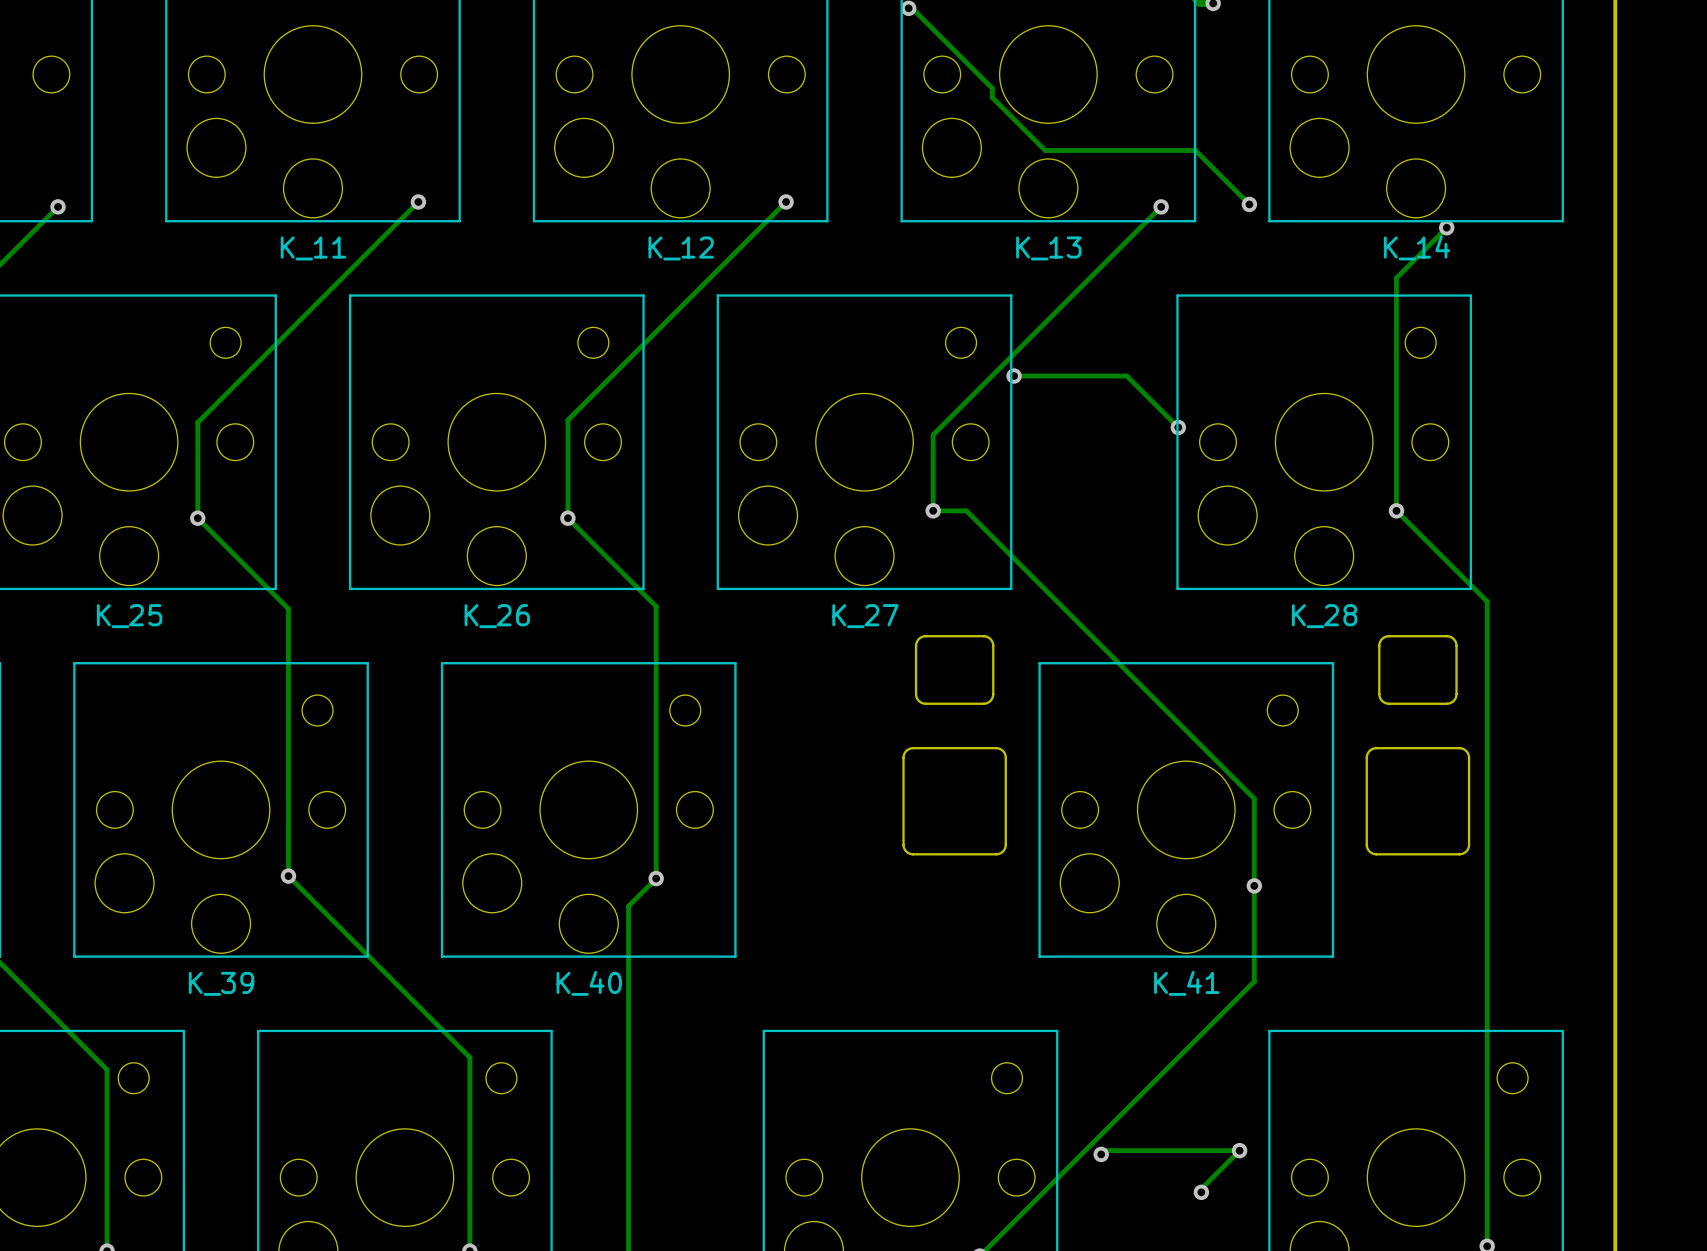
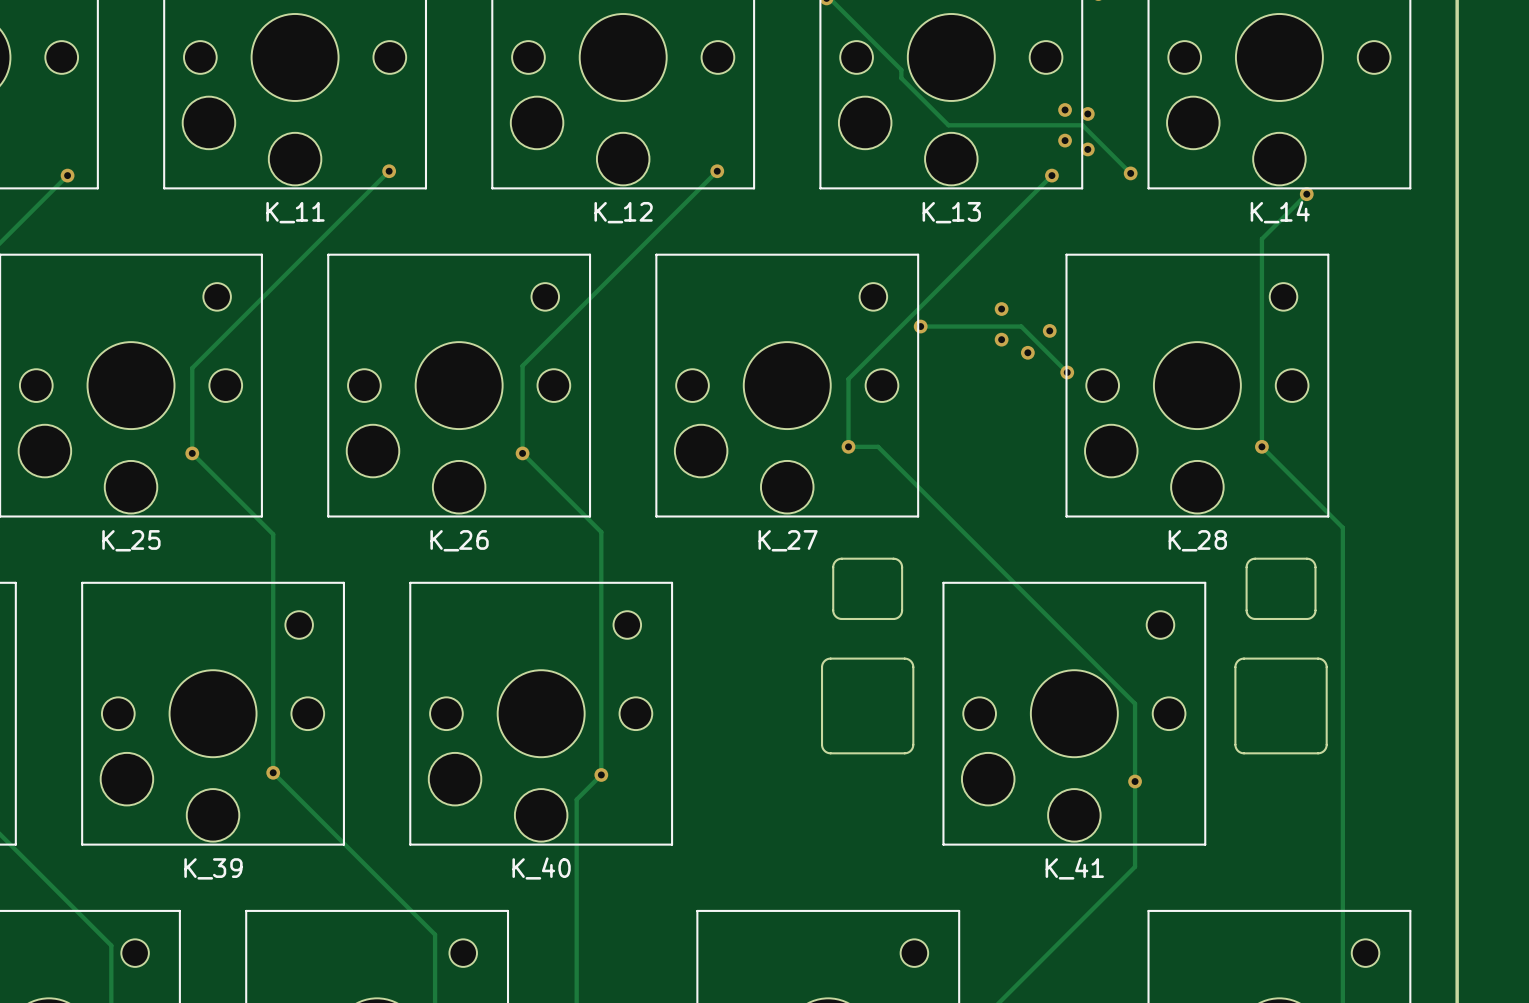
via: none -> (1065, 109)
via: none -> (1087, 113)
via: none -> (1065, 140)
via: none -> (1087, 149)
via: none -> (1001, 309)
via: none -> (1049, 330)
via: none -> (1001, 339)
via: none -> (1027, 352)

